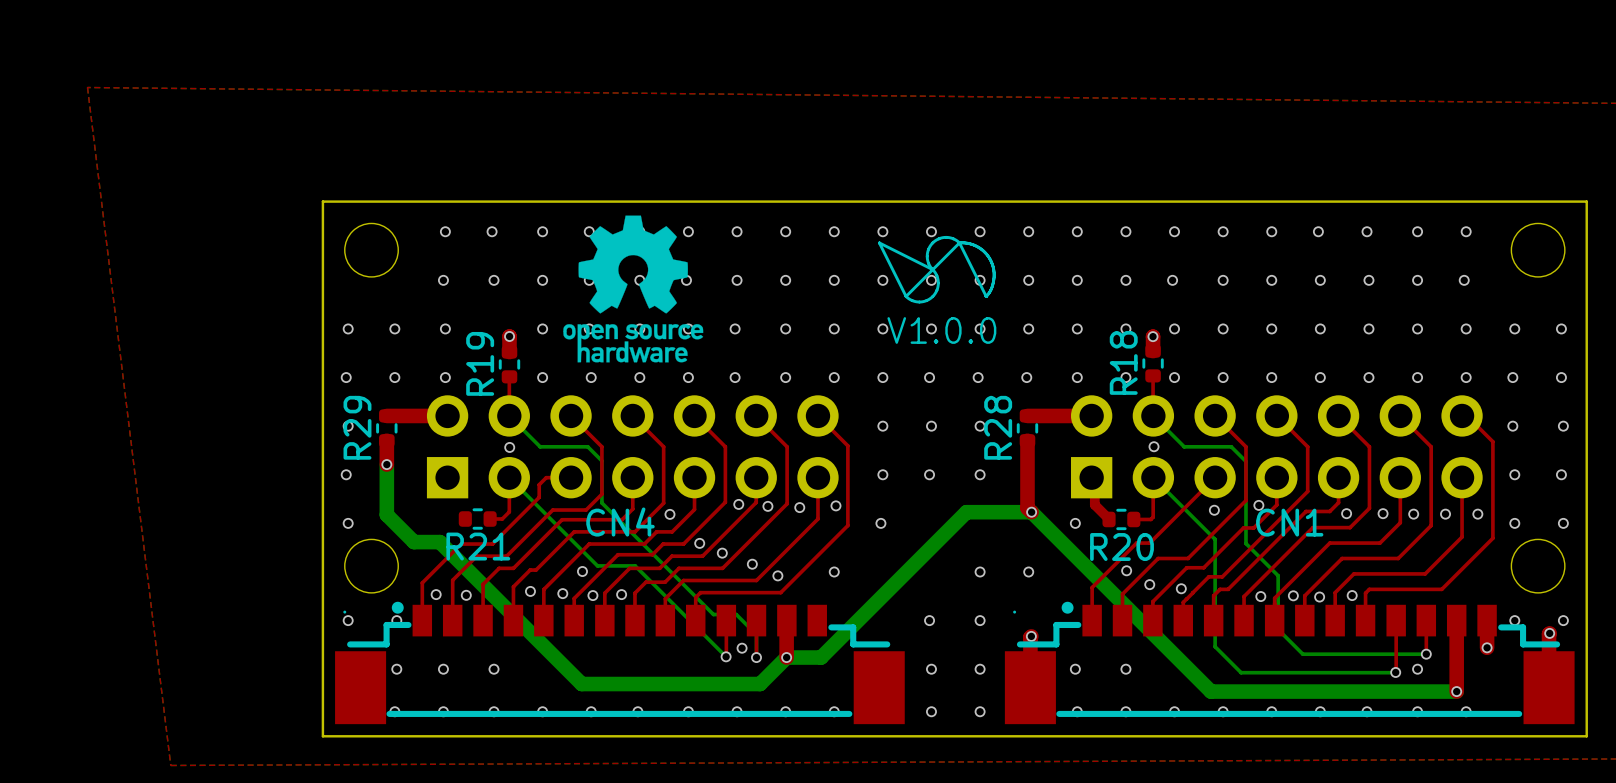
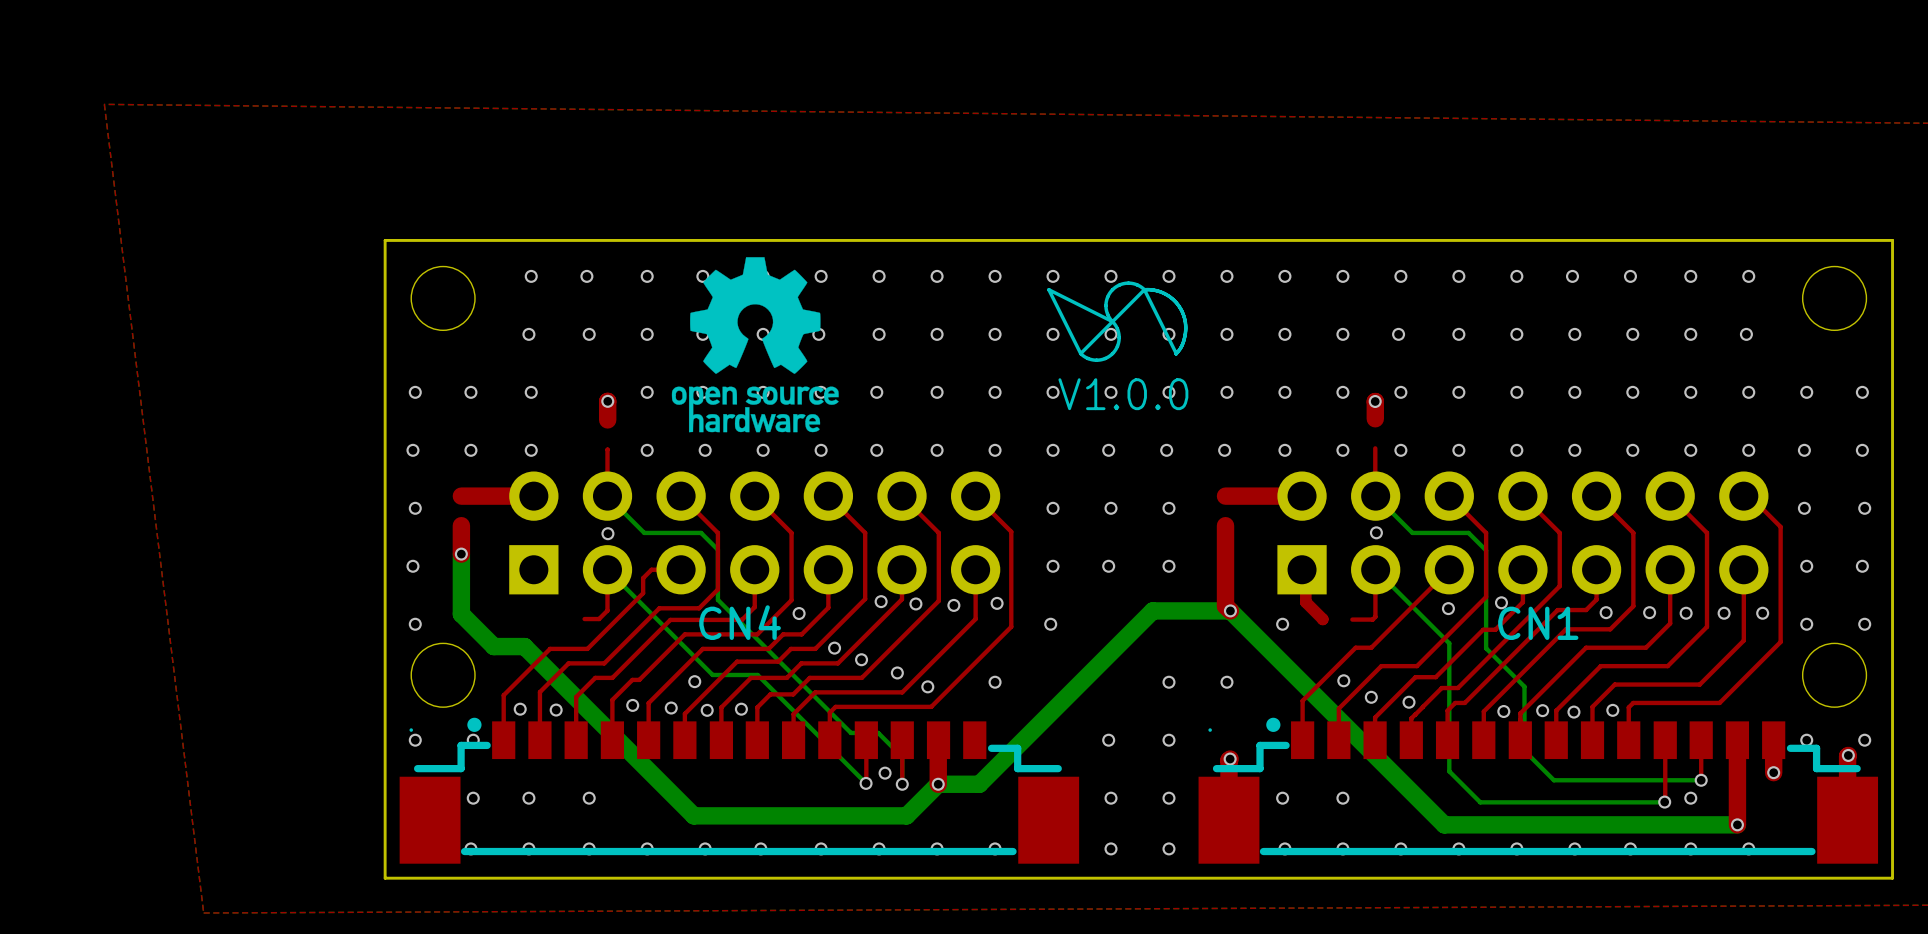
R18: (1153, 363) -> none
R19: (509, 364) -> none
R29: (386, 428) -> none
R28: (1027, 428) -> none
R21: (477, 519) -> none
R20: (1121, 519) -> none

